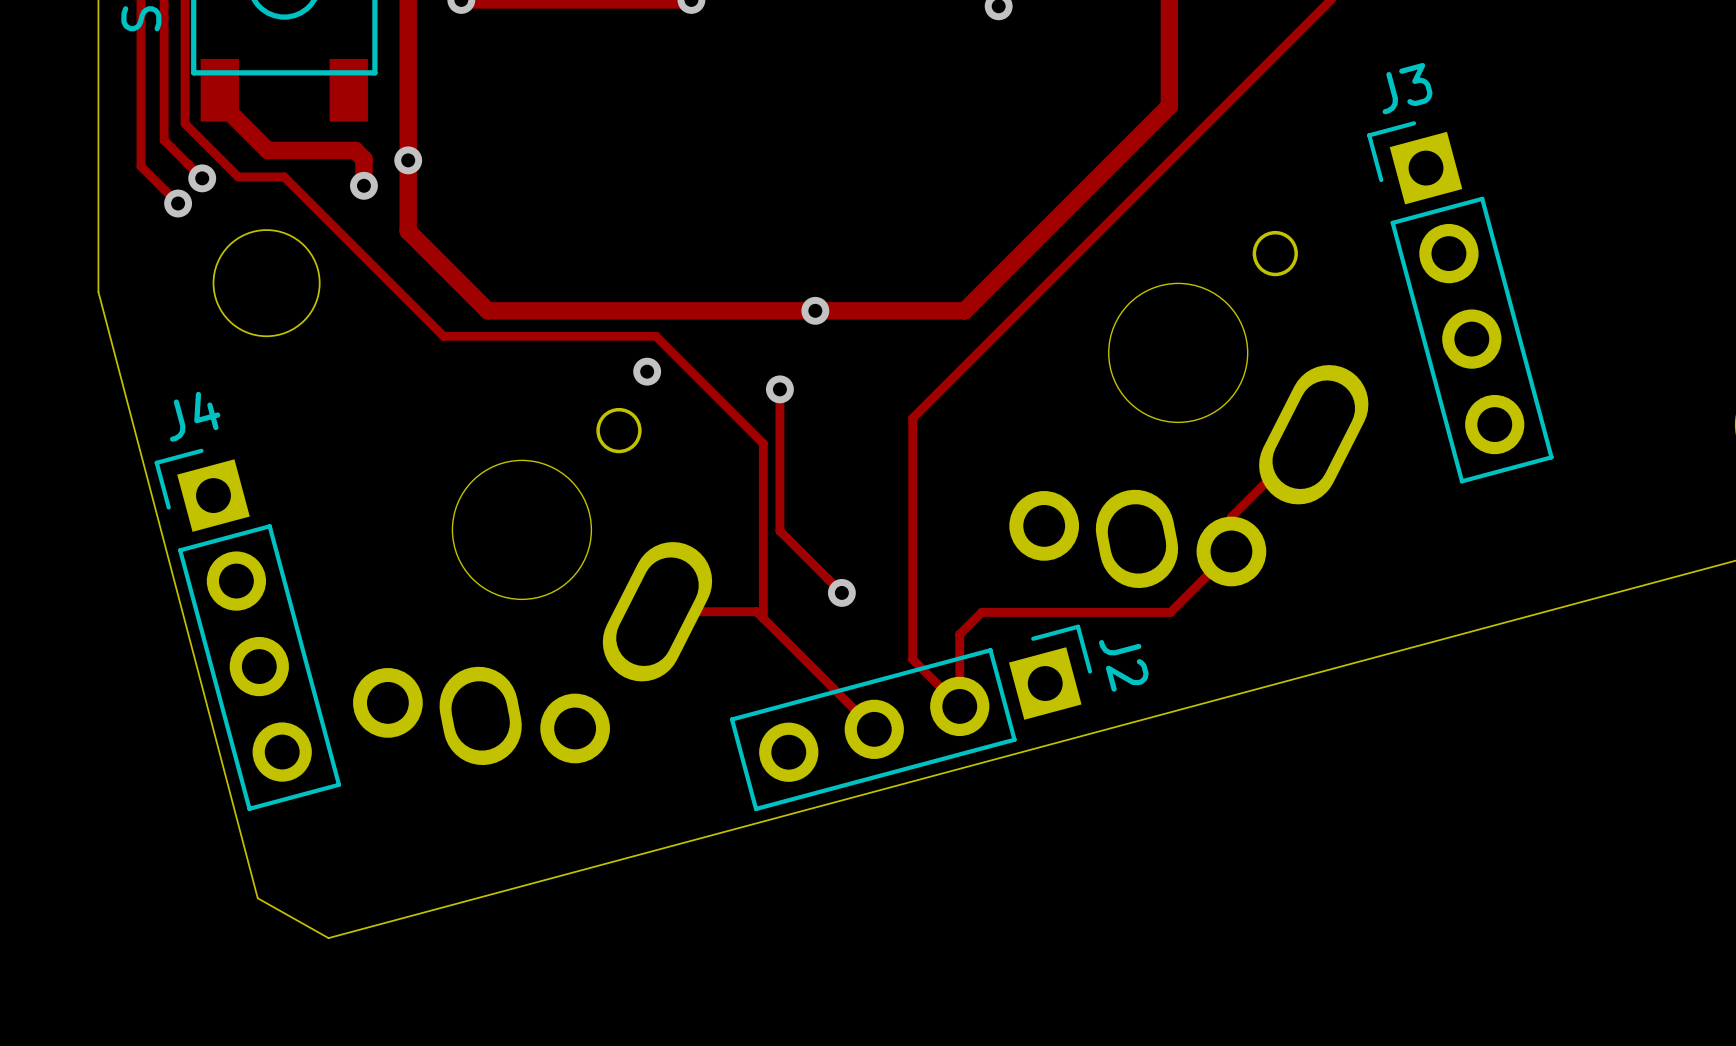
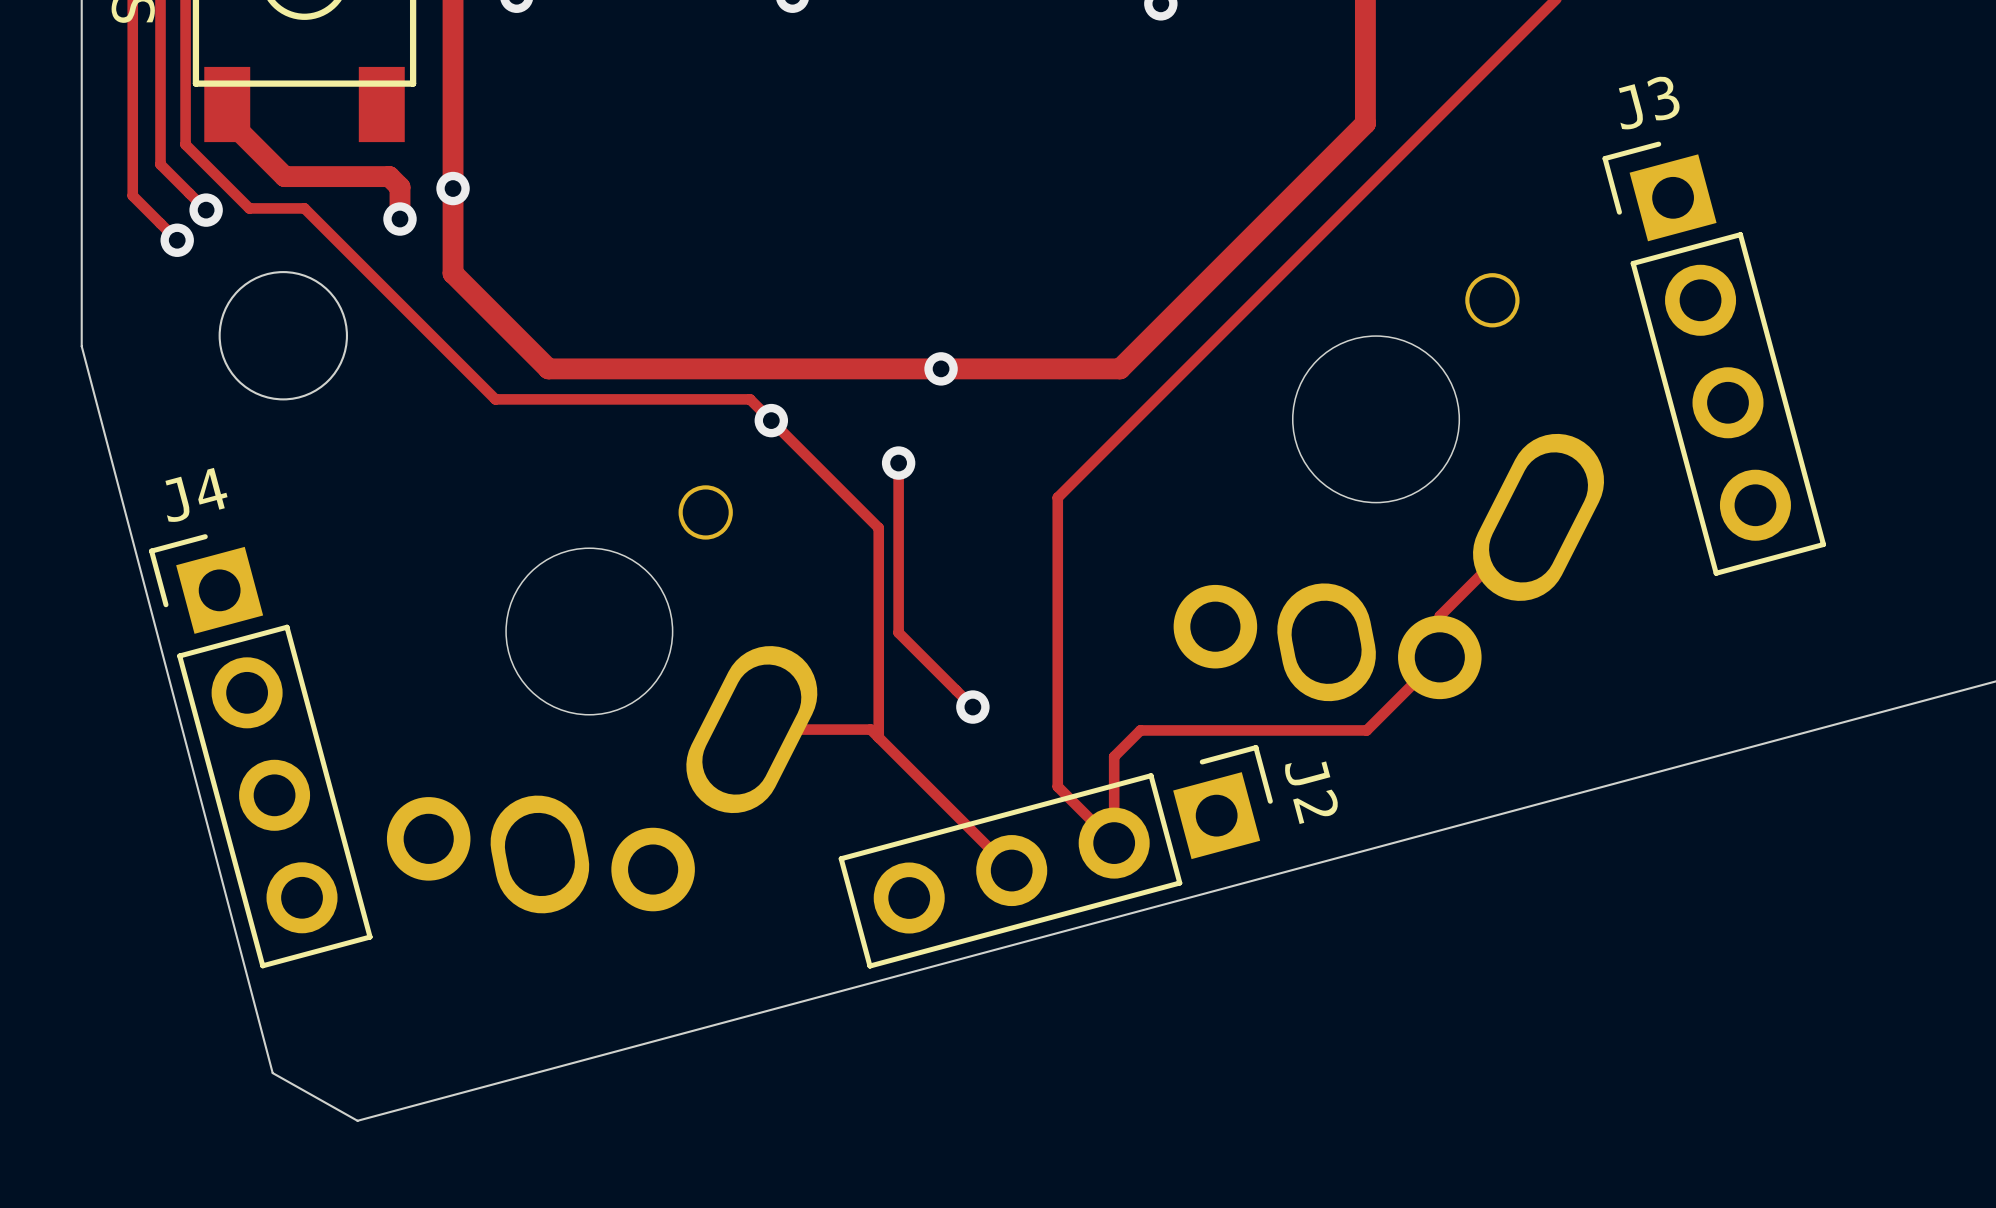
via position: (647, 371) -> (771, 420)

